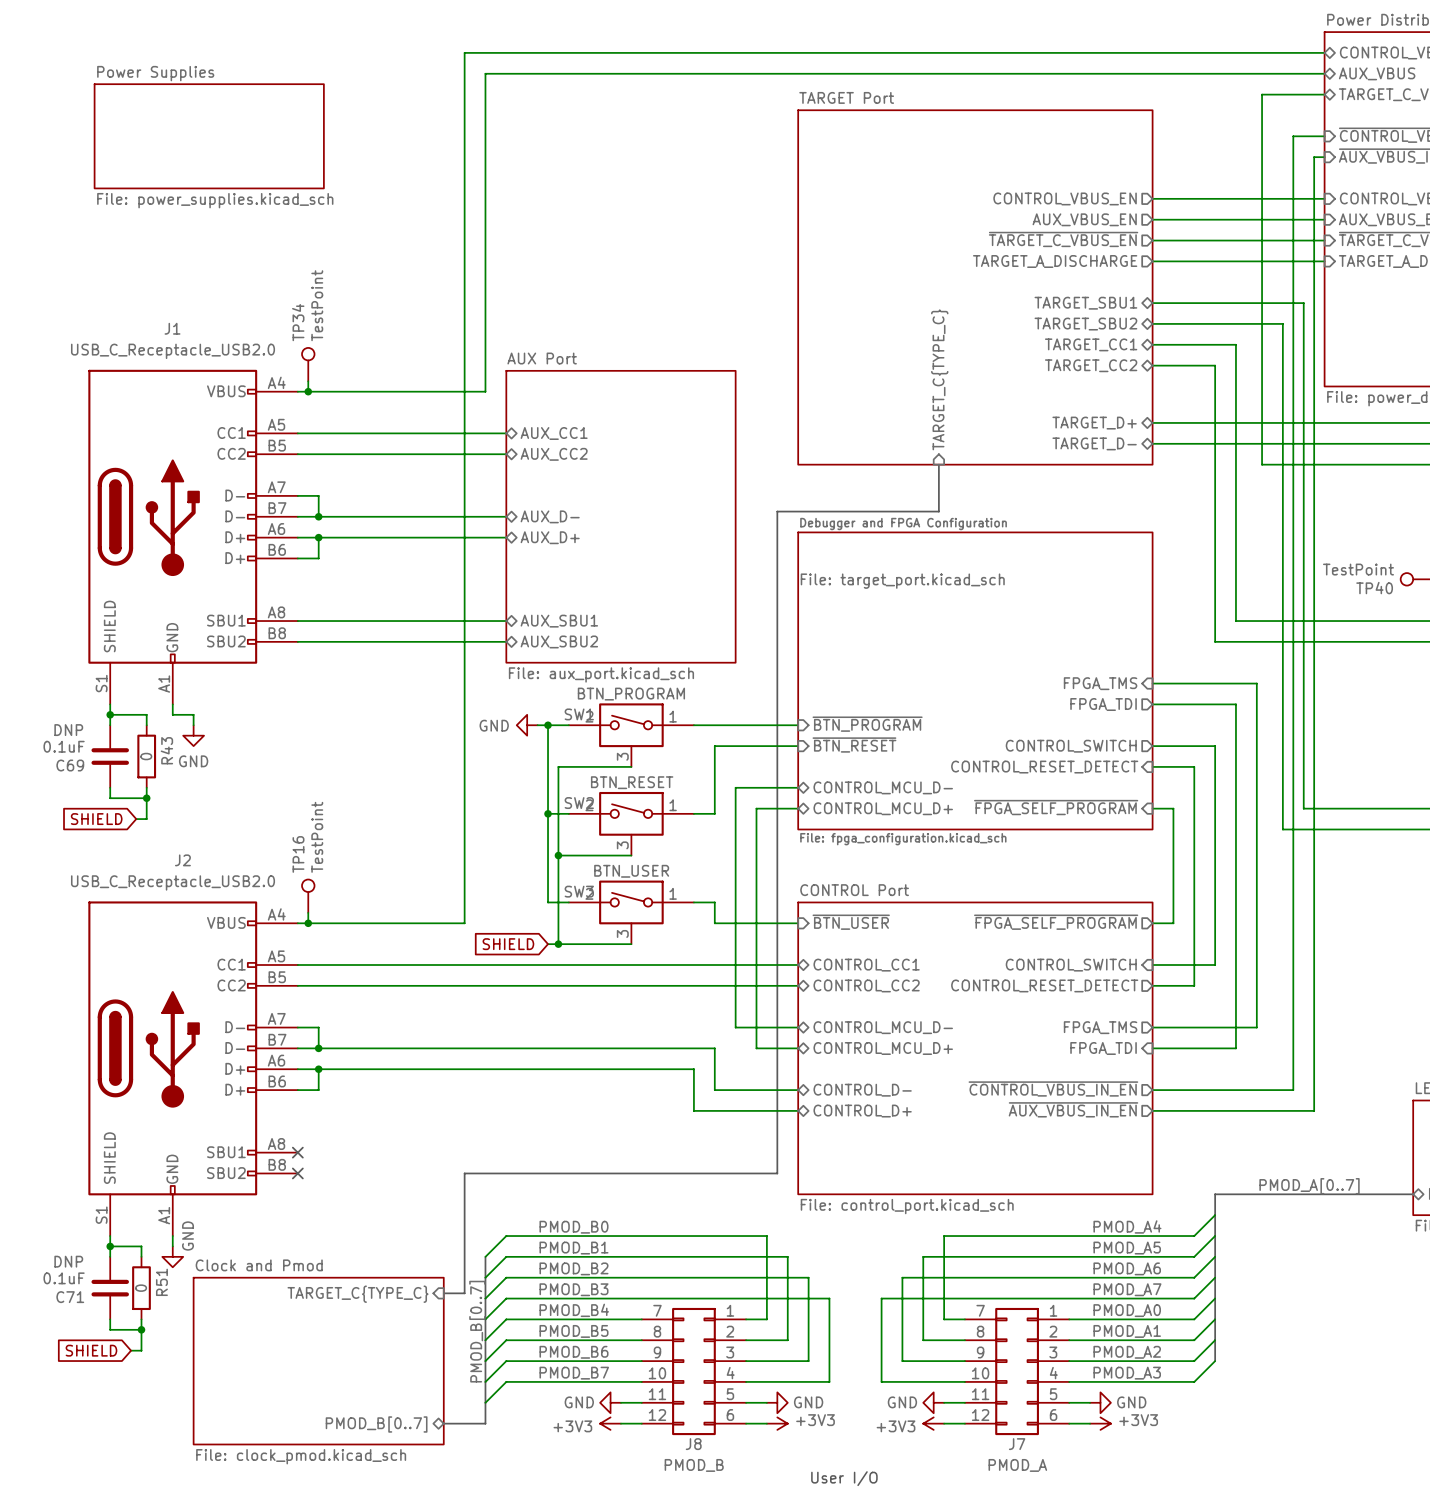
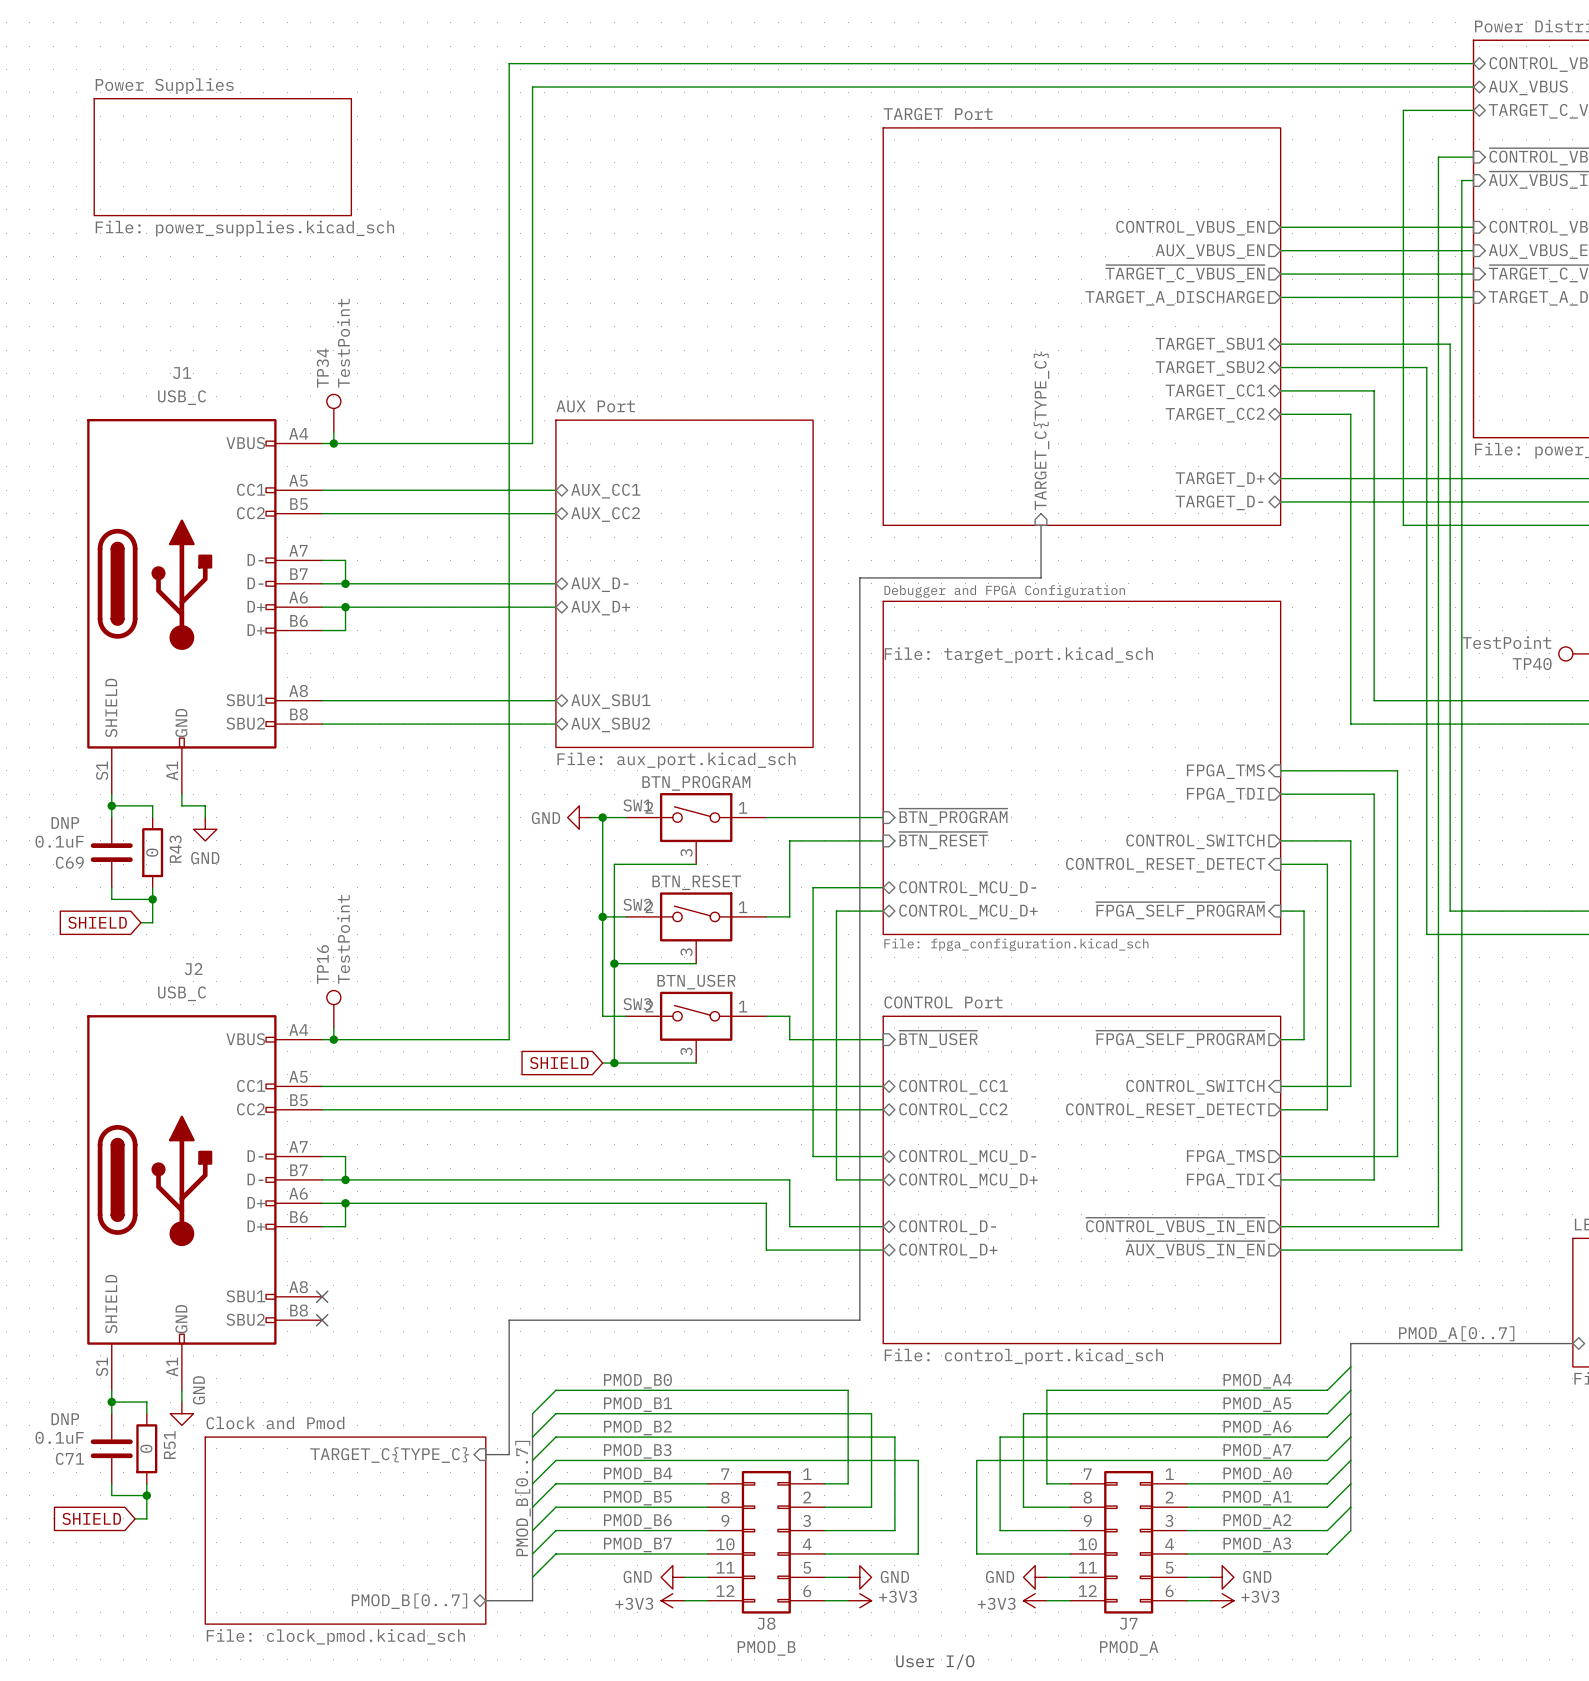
J1 value: USB_C_Receptacle_USB2.0 (173, 351) -> USB_C (182, 397)
J2 value: USB_C_Receptacle_USB2.0 (173, 882) -> USB_C (182, 993)

